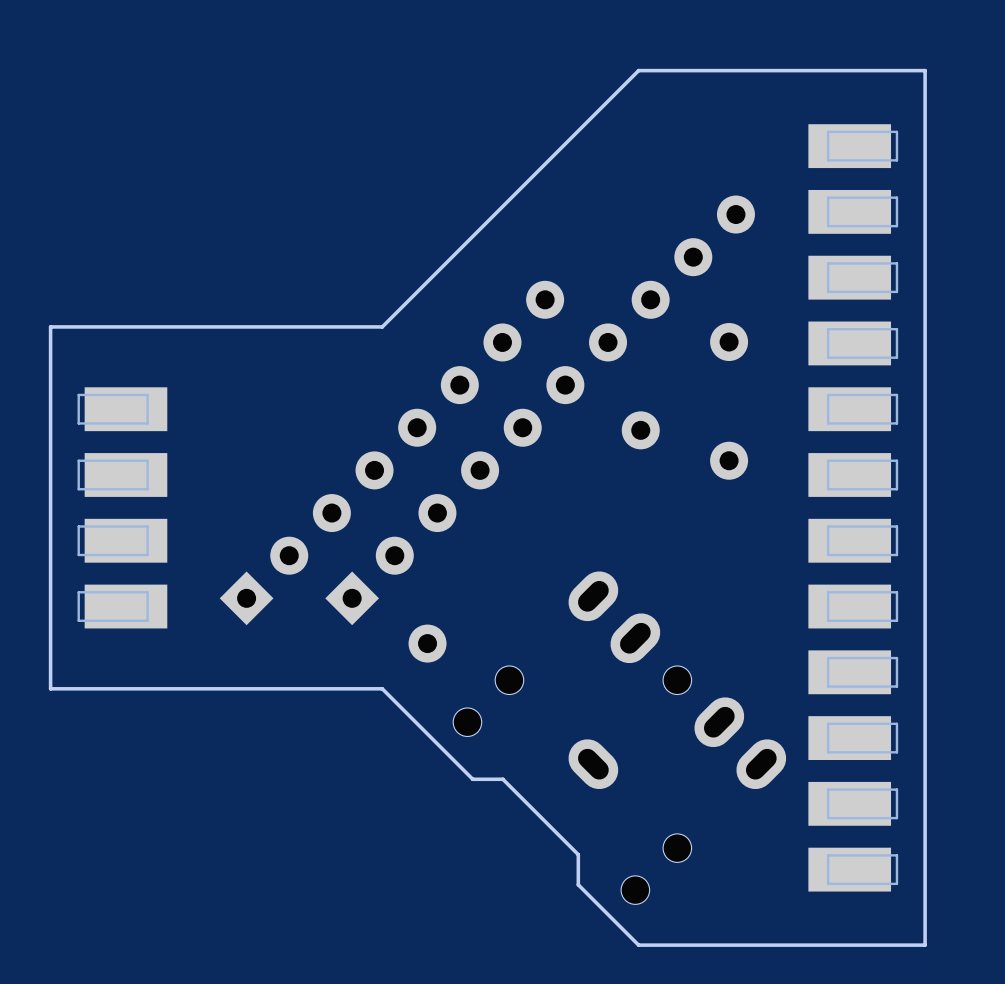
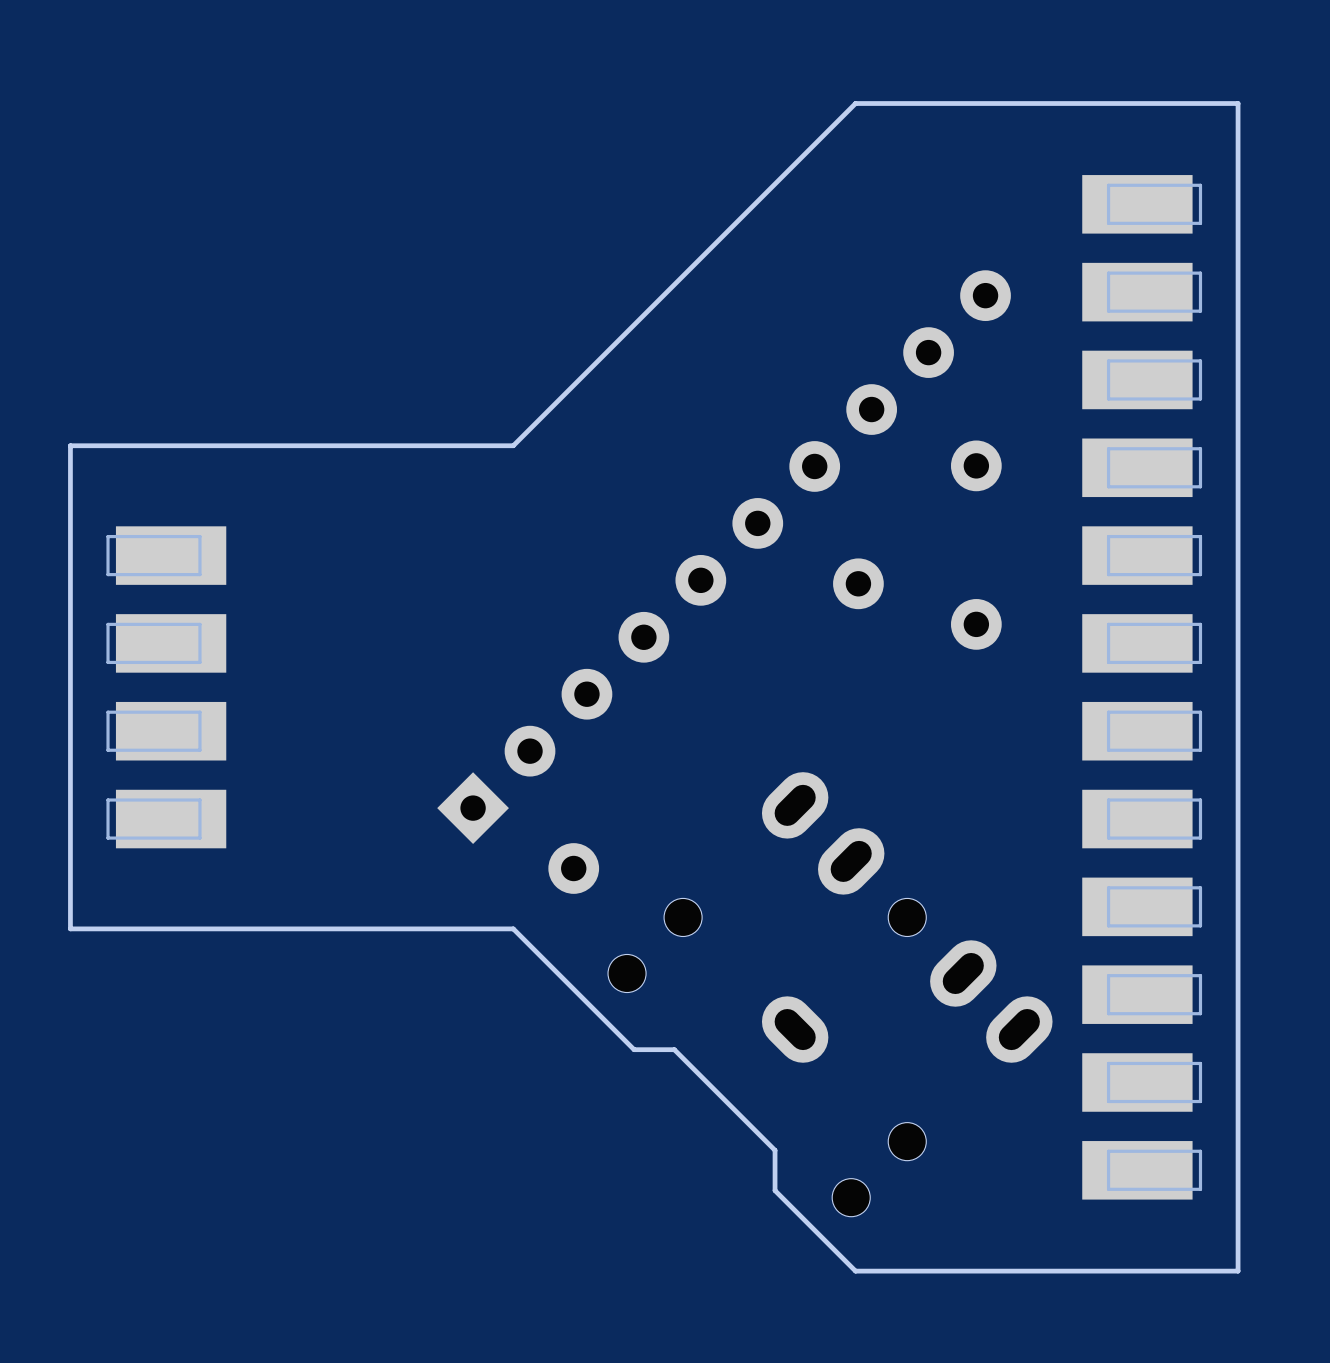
part: (391, 453) -> none

